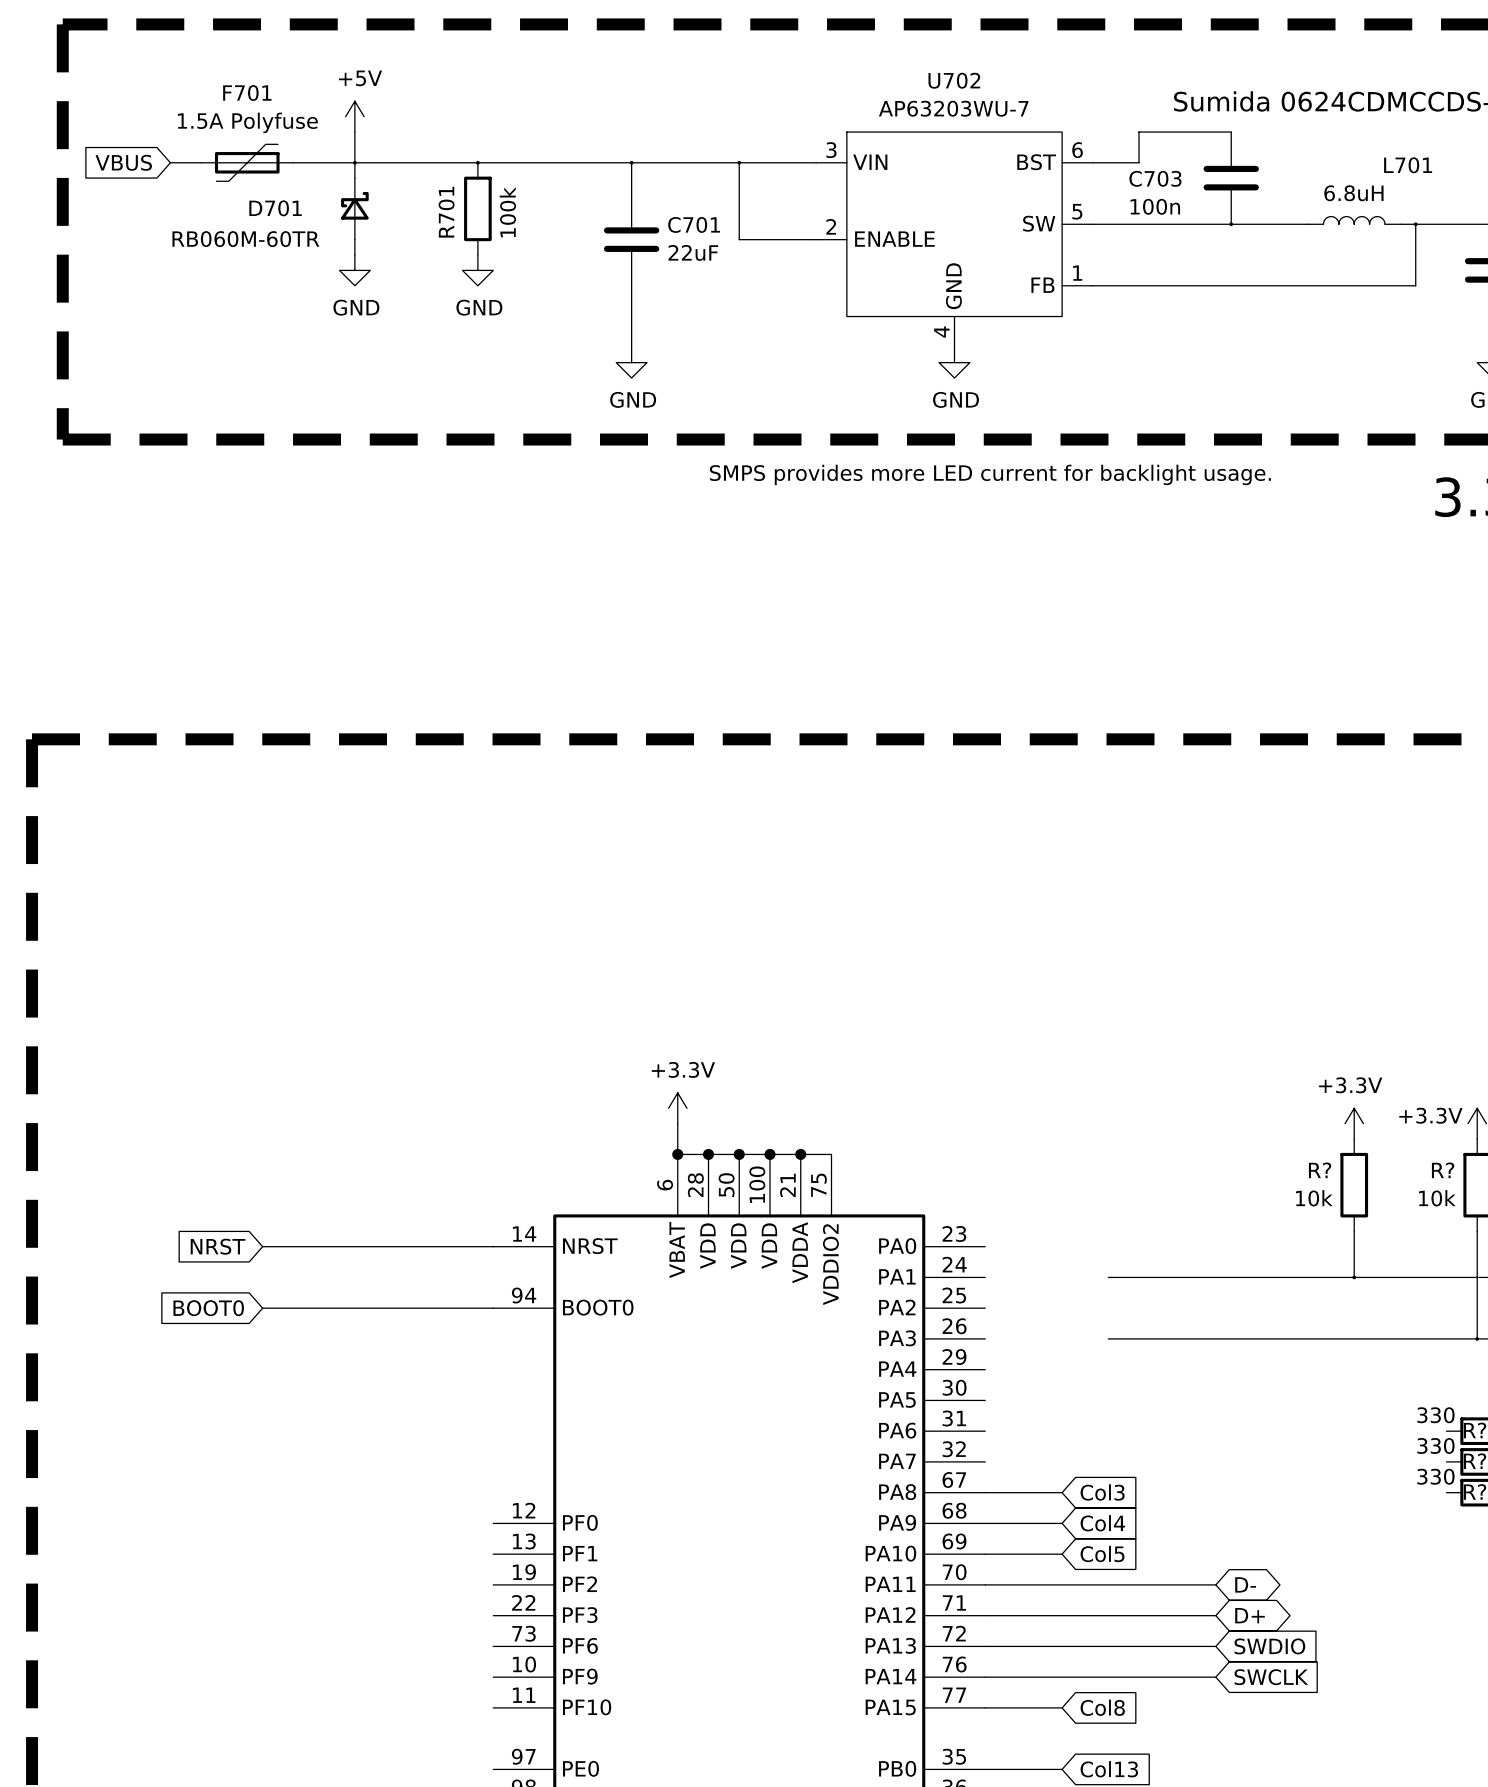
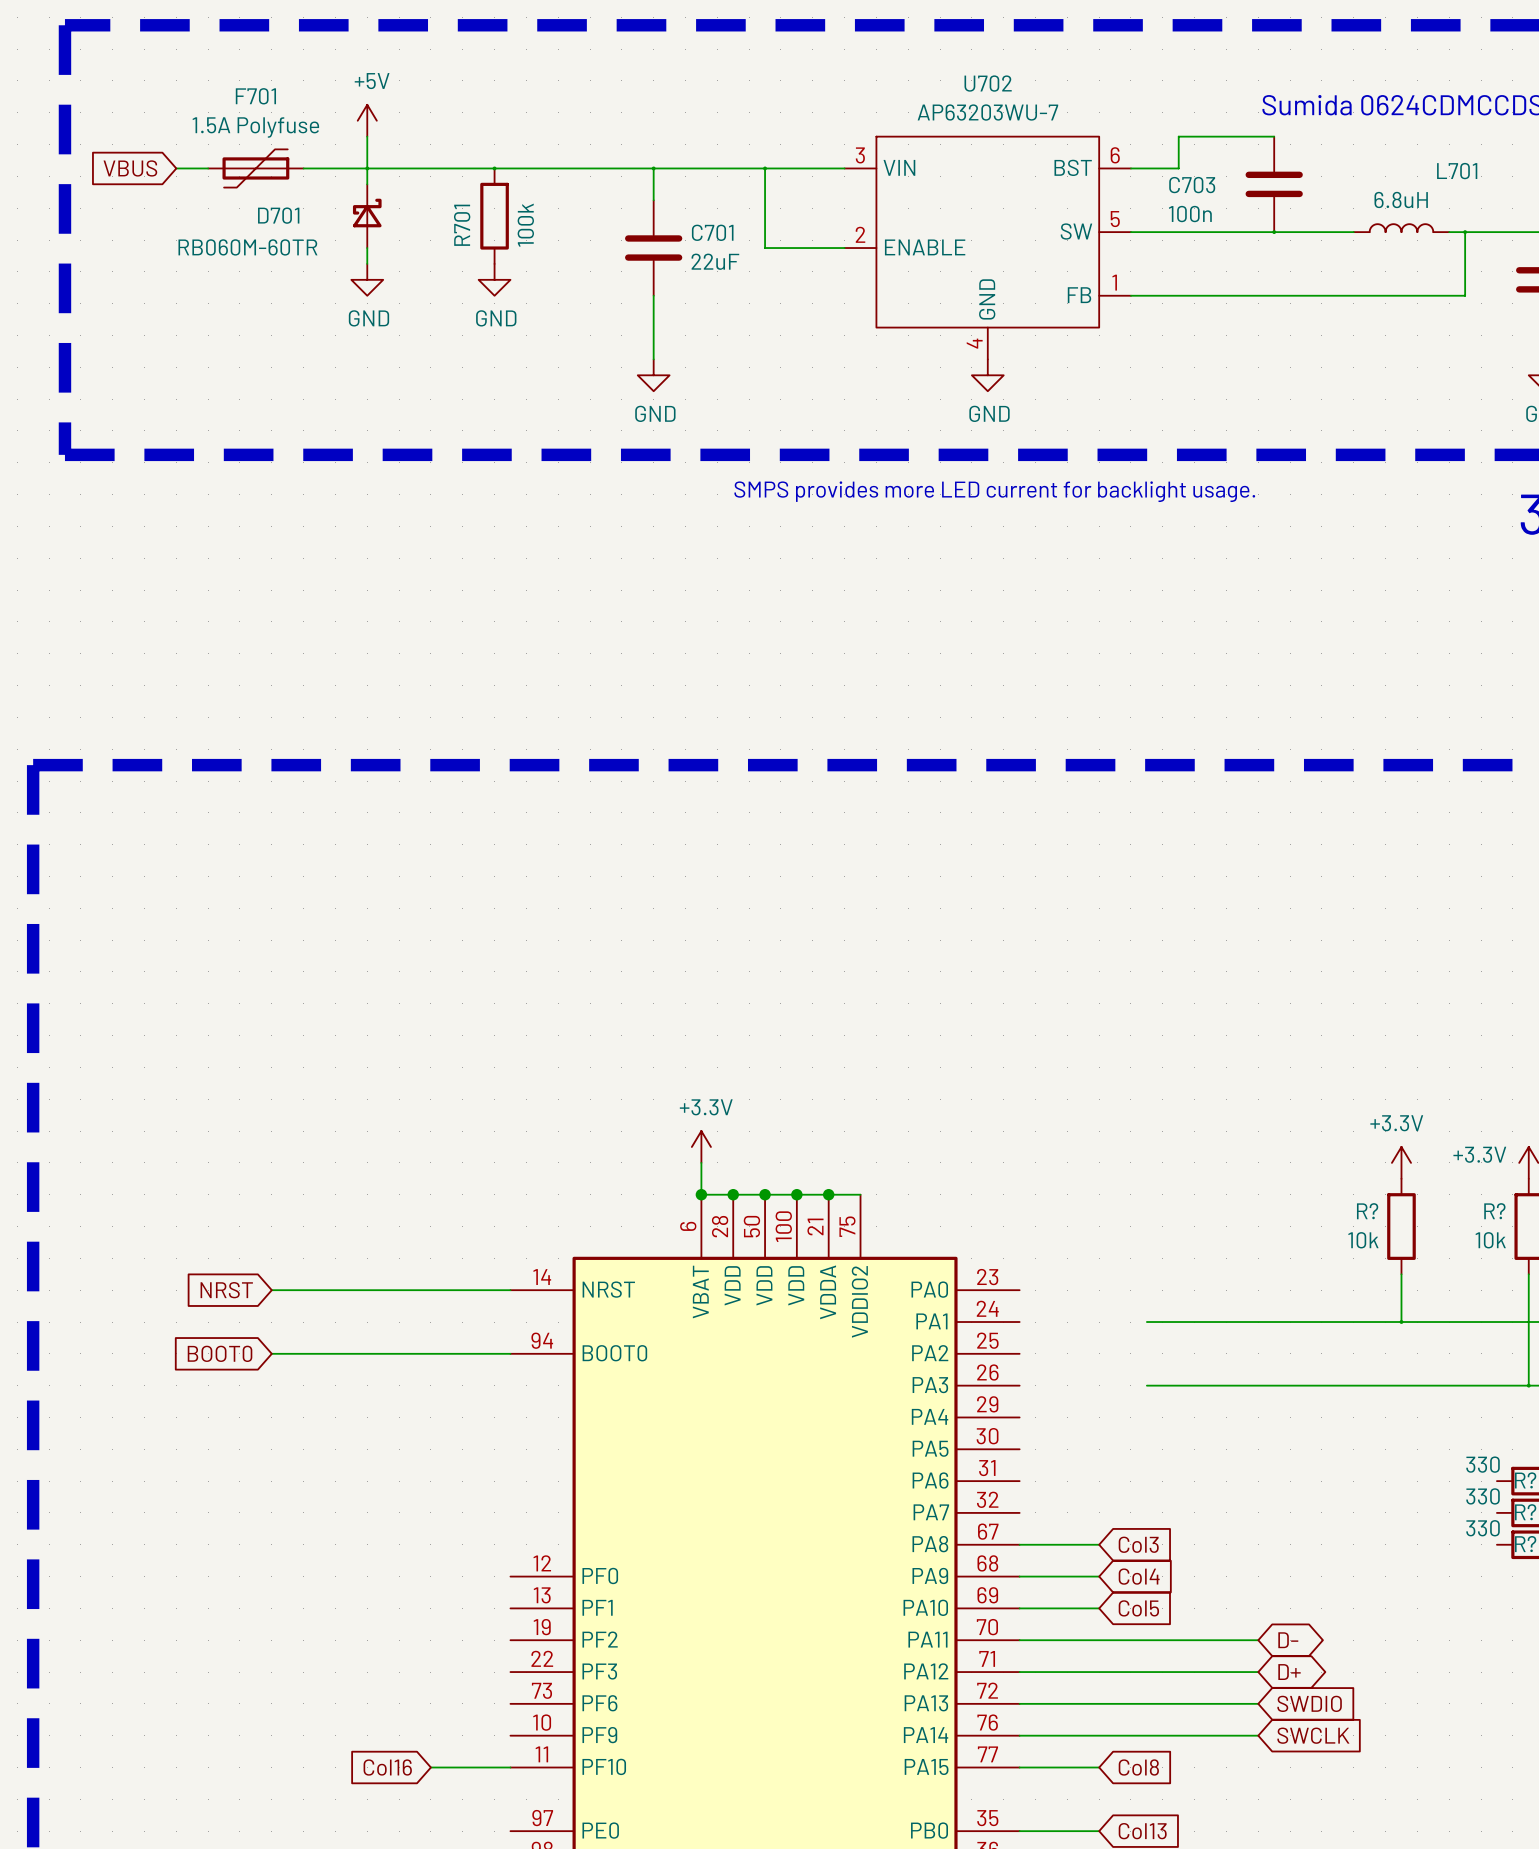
global label: none -> Col16 (387, 1767)
wire: none -> (430, 1767) (510, 1767)

